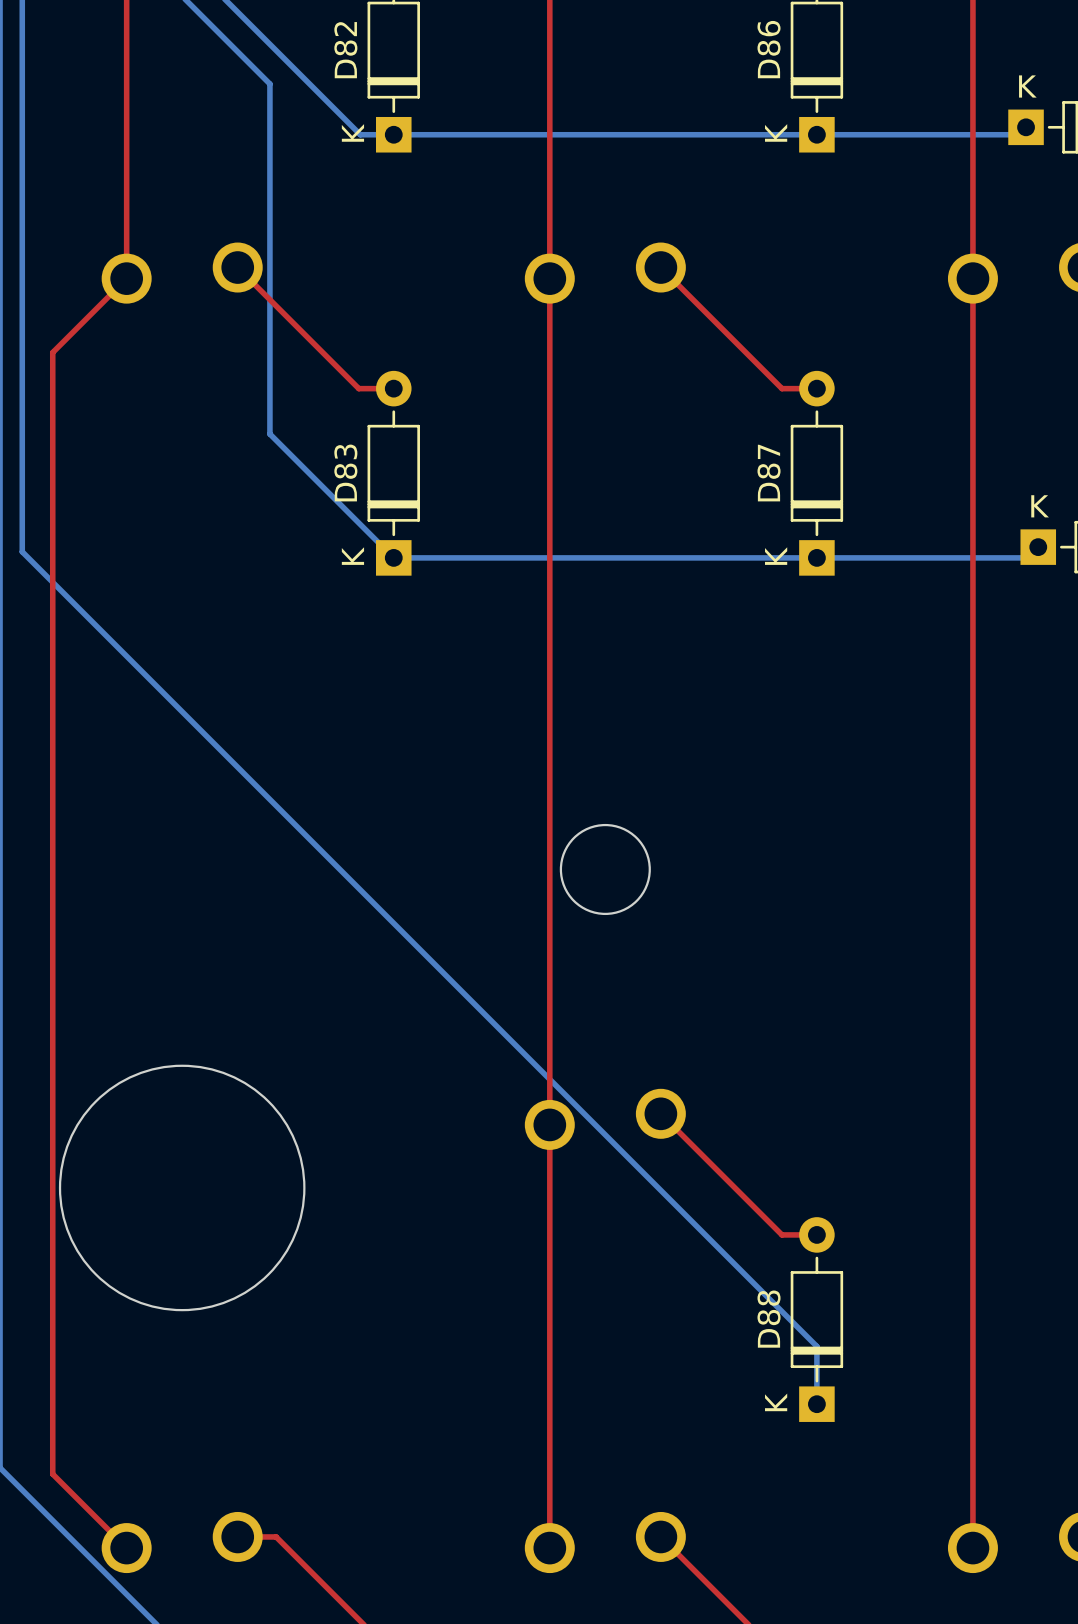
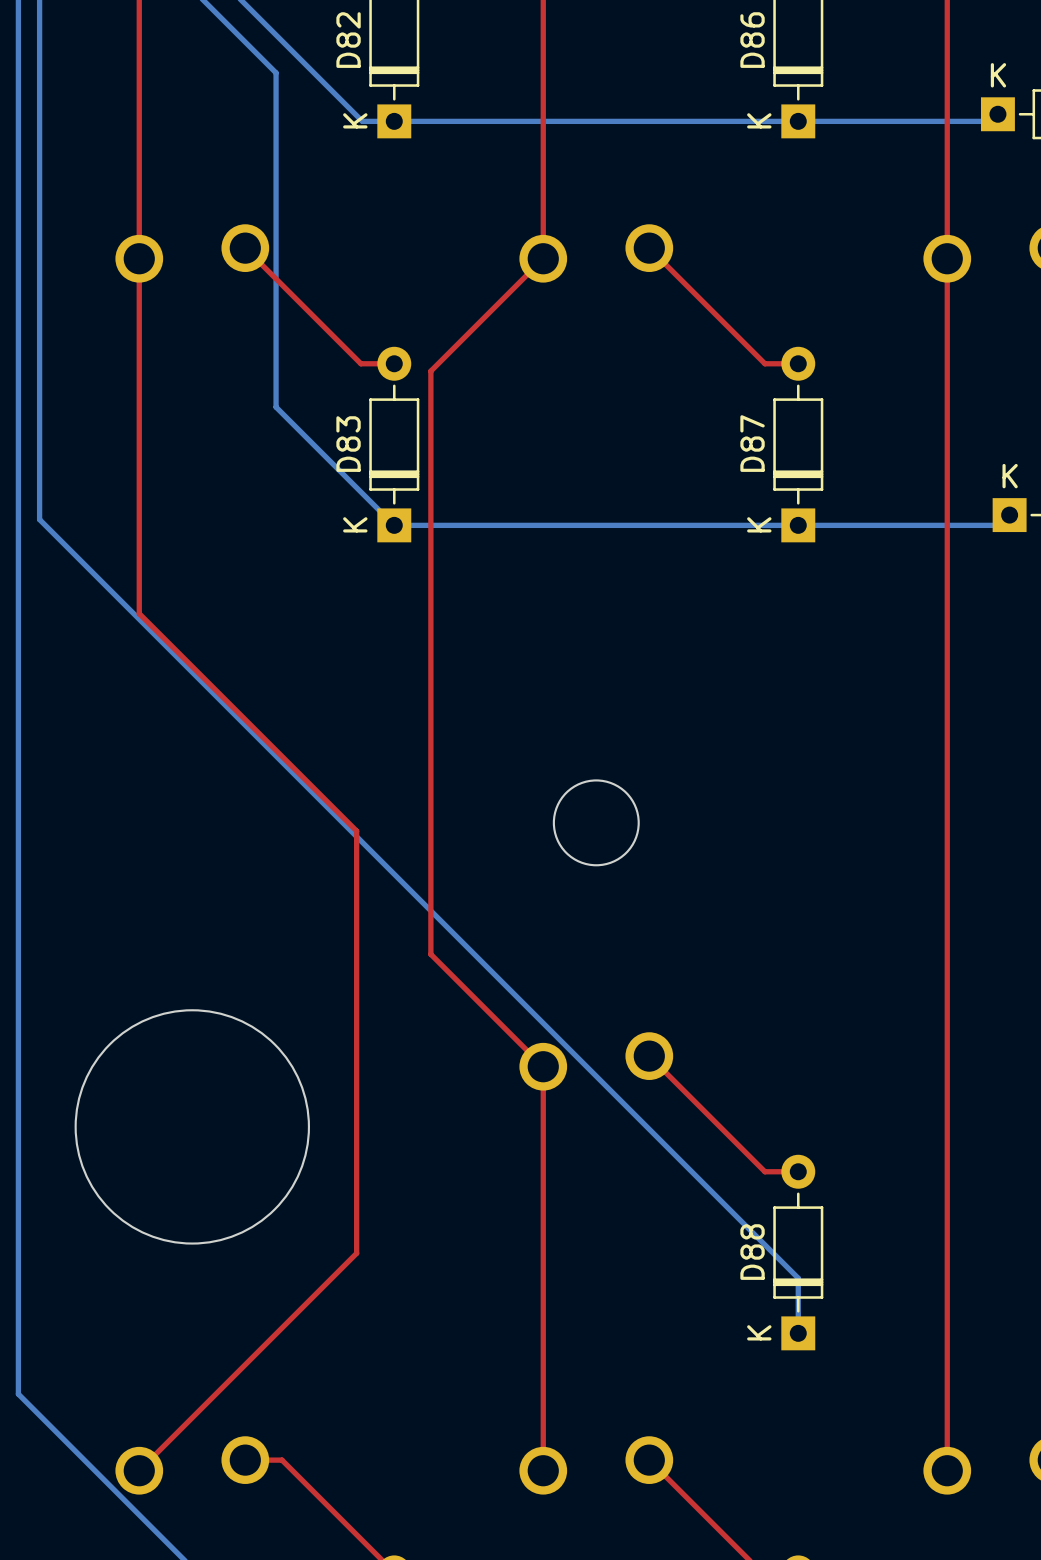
top track: (126, 278) (52, 352) (52, 1474) (126, 1548) -> (139, 258) (139, 613) (356, 831) (356, 1253) (139, 1470)
top track: (549, 278) (549, 1124) -> (543, 258) (430, 371) (430, 954) (543, 1066)

